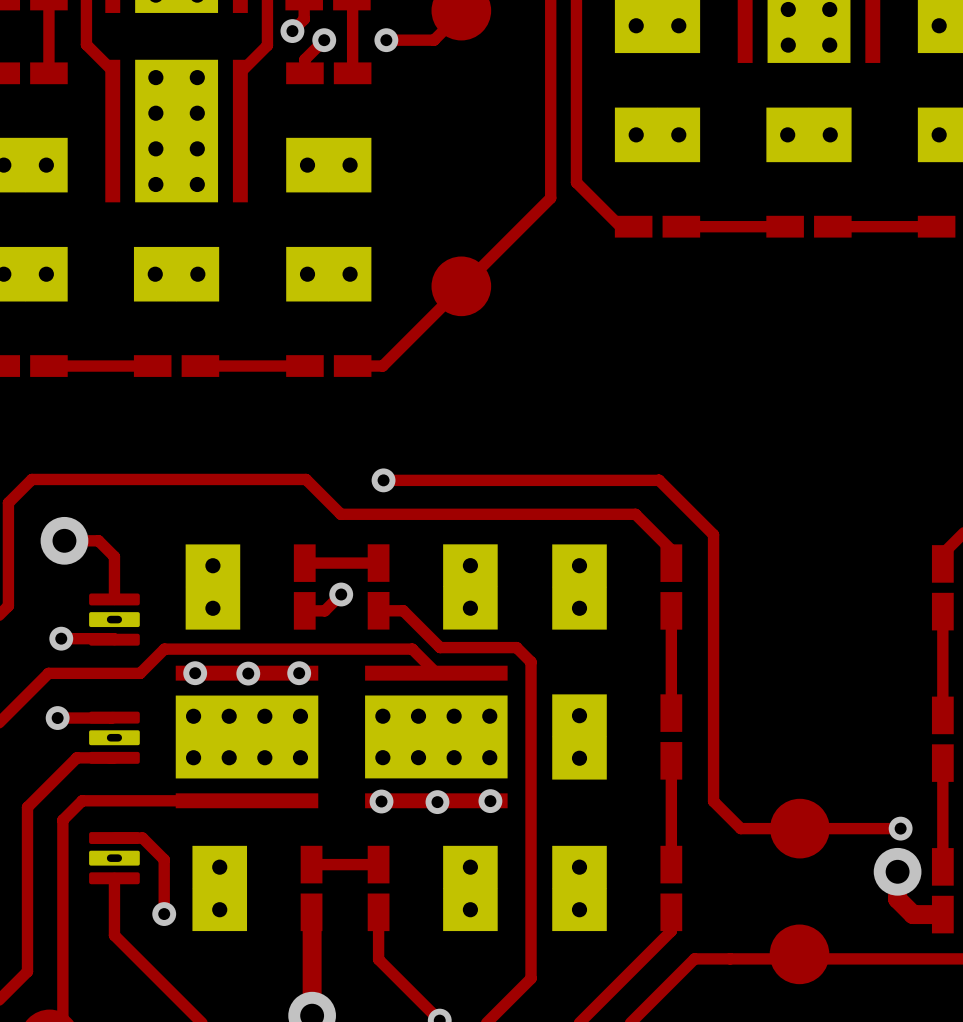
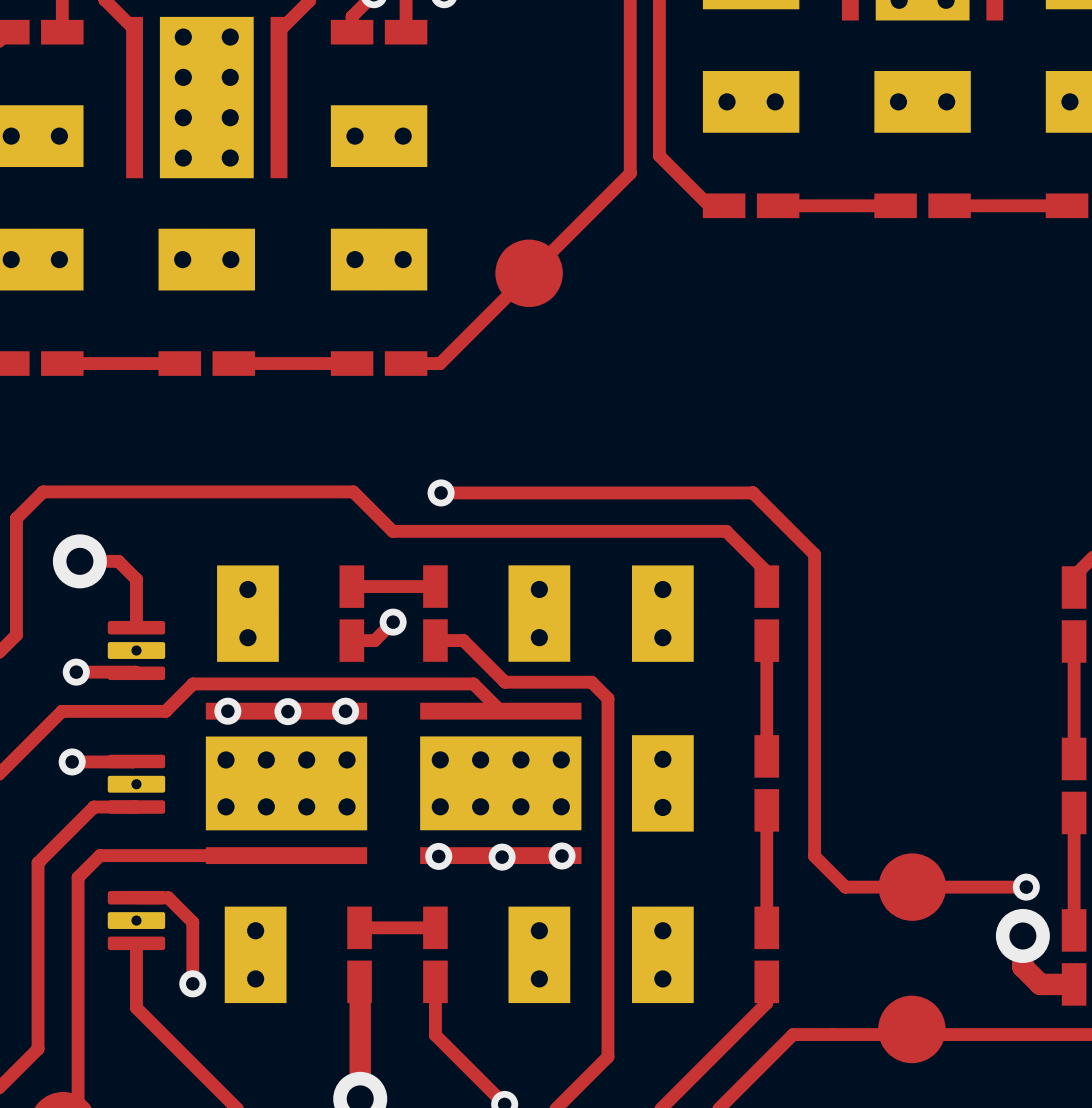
part footprint: [89, 593, 140, 646] -> [107, 620, 166, 681]
part footprint: [89, 711, 140, 764] -> [107, 754, 166, 814]
part footprint: [89, 832, 140, 885] -> [107, 891, 166, 951]

